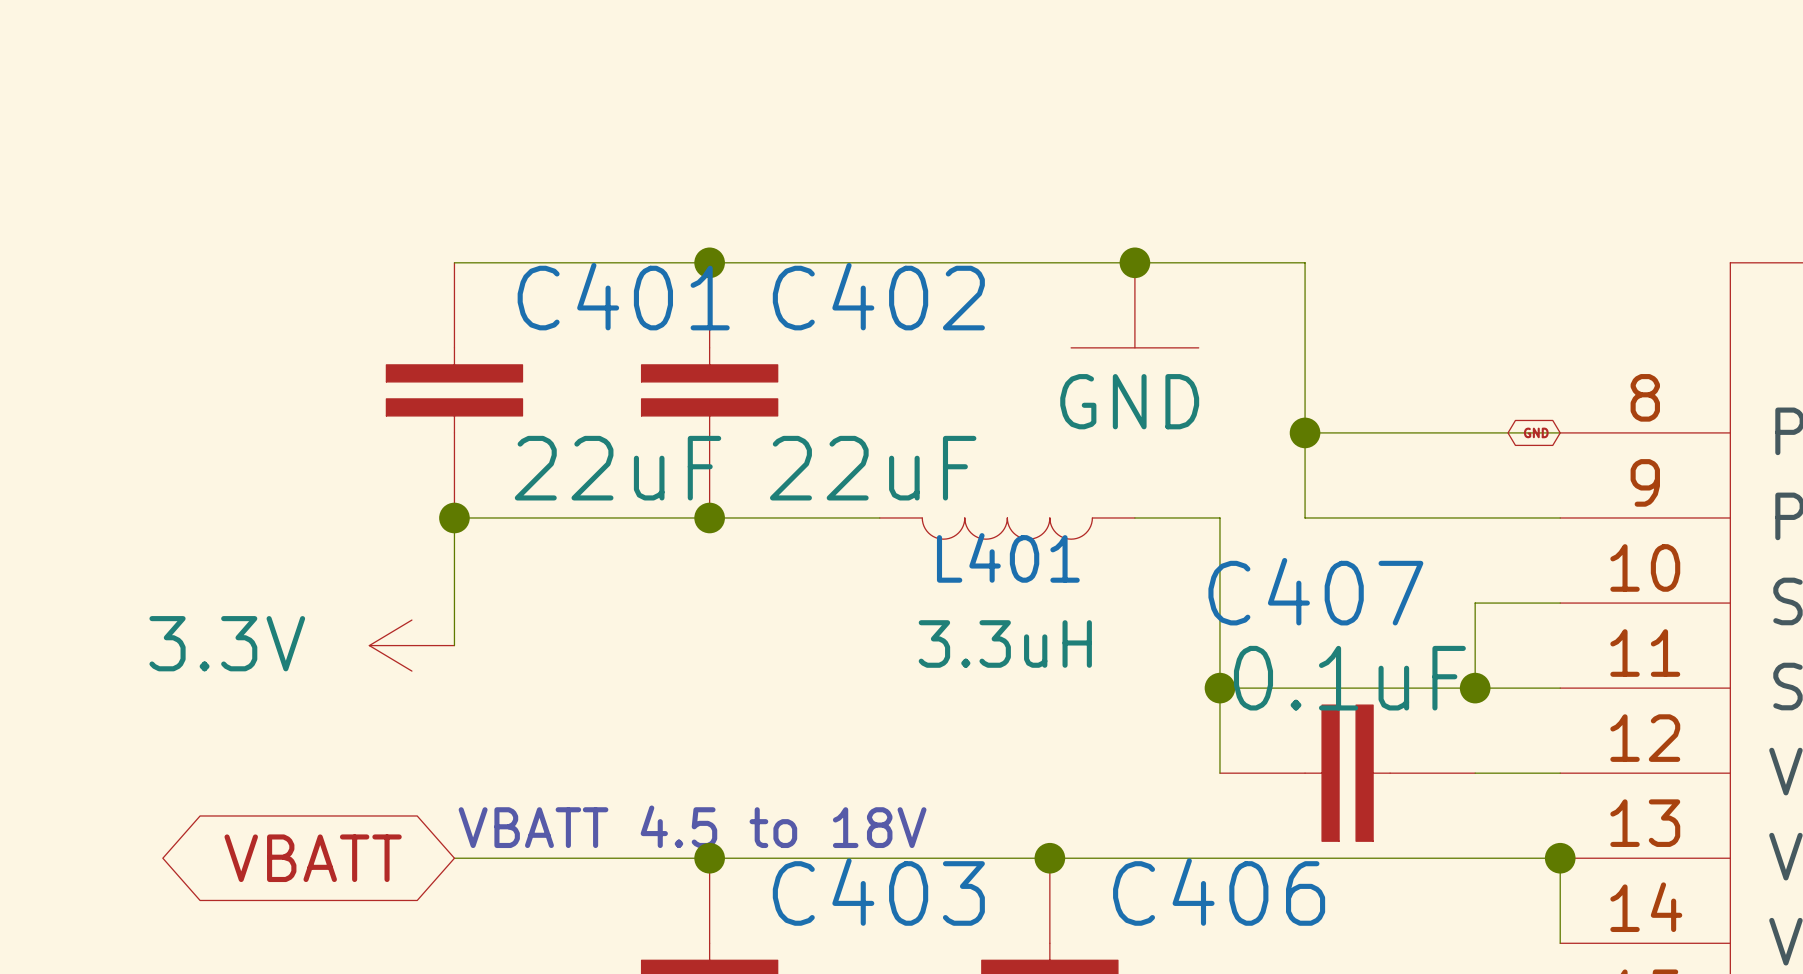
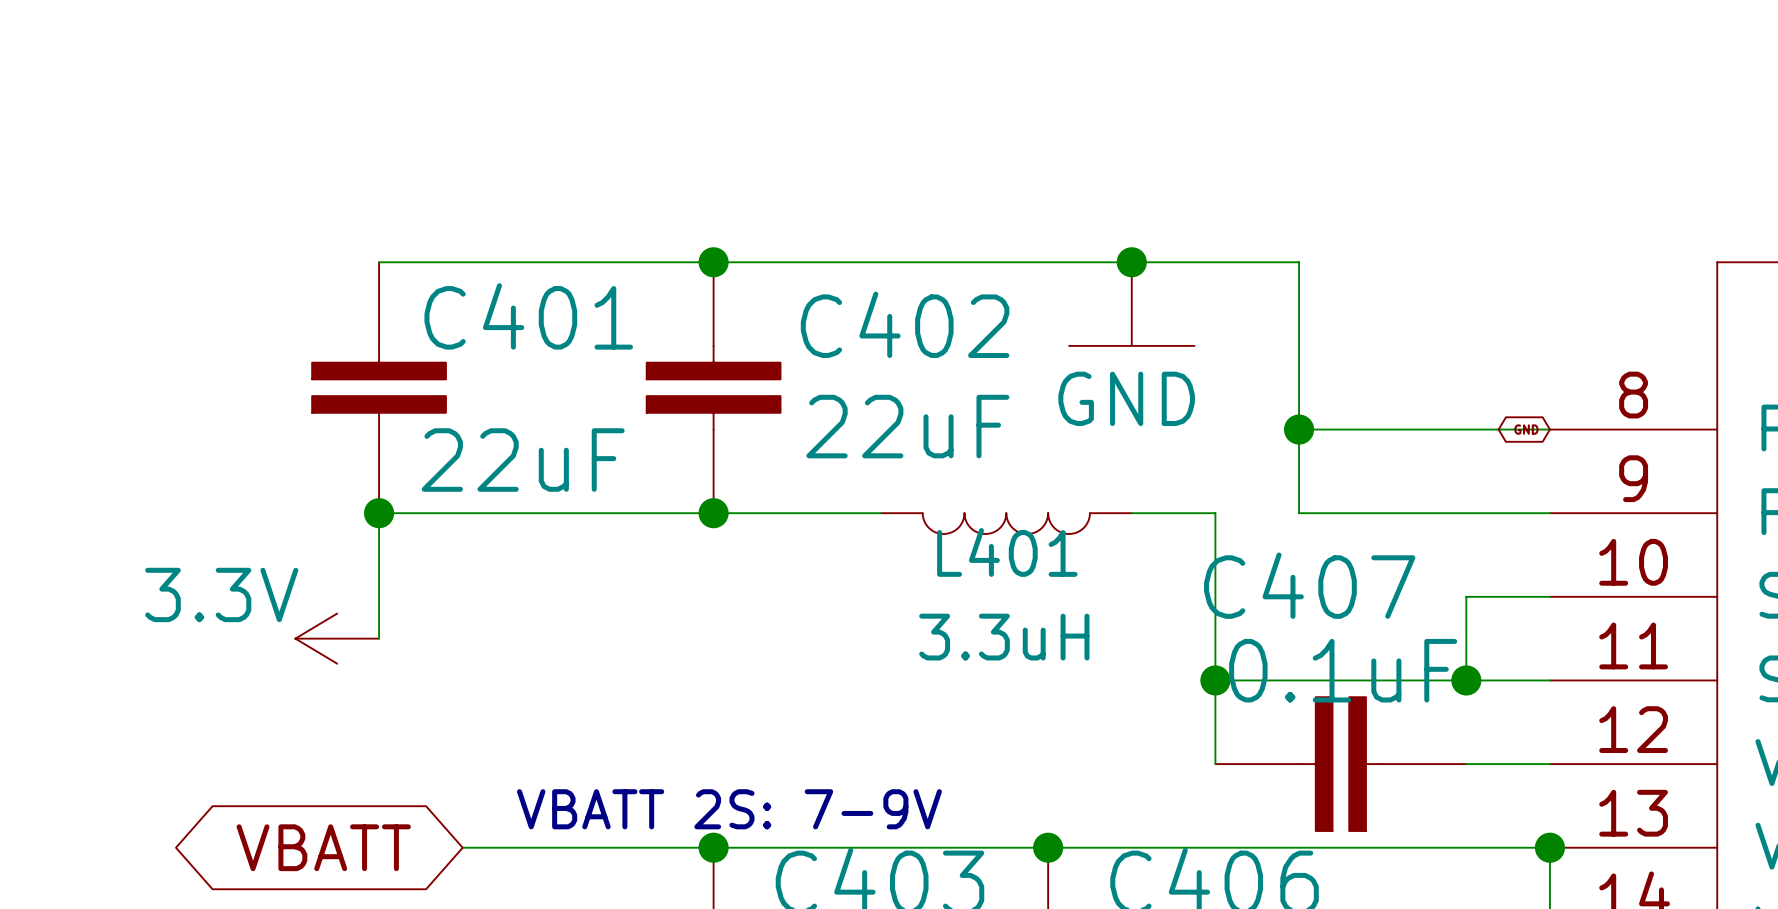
wire: none -> (379, 262) (462, 262)
C401 name position: C401 (623, 296) -> C401 (528, 316)
C402 name position: C402 (878, 296) -> C402 (905, 324)
C401 position: (454, 390) -> (379, 387)
C401 value position: 22uF (618, 468) -> 22uF (523, 460)
C402 value position: 22uF (873, 468) -> 22uF (907, 426)
wire: (454, 517) (454, 645) -> (462, 513) (379, 513) (379, 638)
junction position: (454, 517) -> (379, 513)
power symbol text position: 3.3V (227, 643) -> 3.3V (221, 594)
power symbol position: 3.3V (411, 645) -> 3.3V (337, 638)
text: none -> VBATT 2S: 7-9V (729, 809)
text: VBATT 4.5 to 18V (692, 826) -> none

